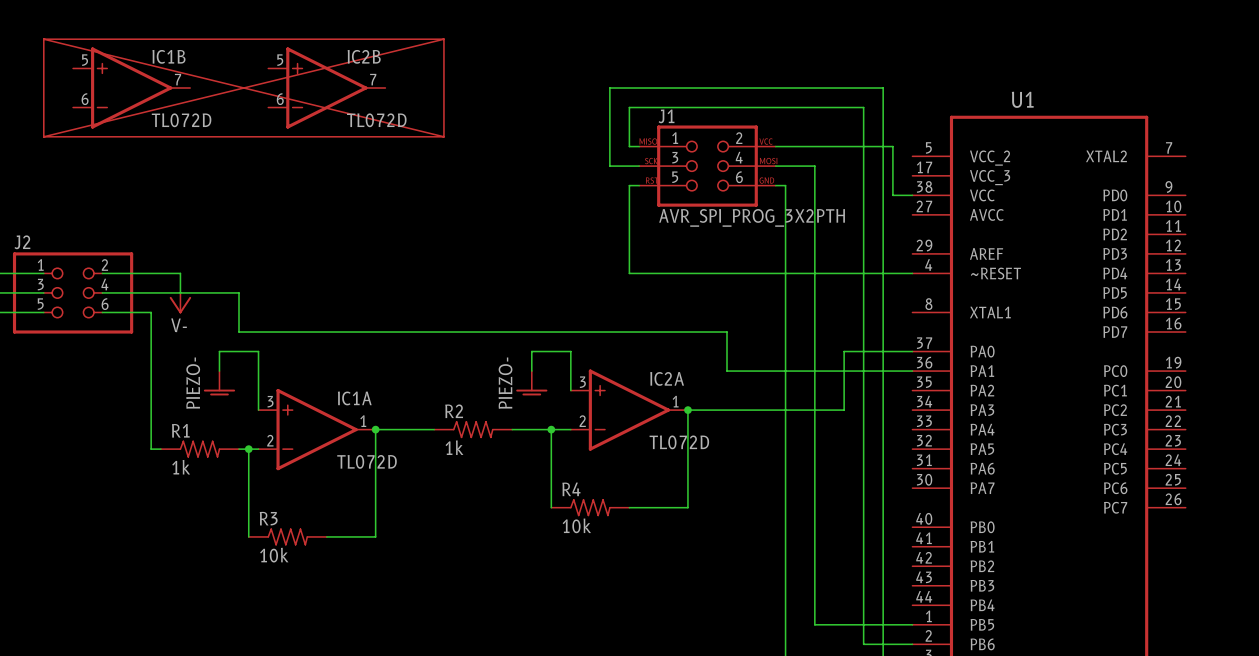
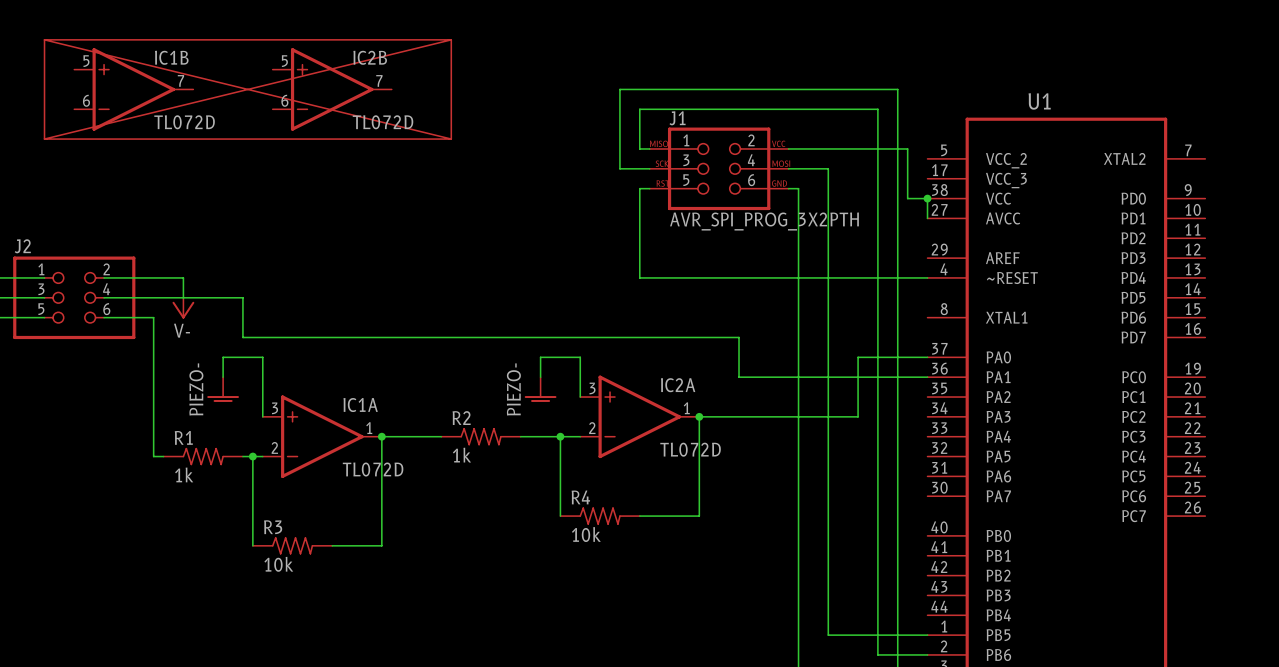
wire: none -> (927, 198) (927, 218)
junction: none -> (927, 198)

